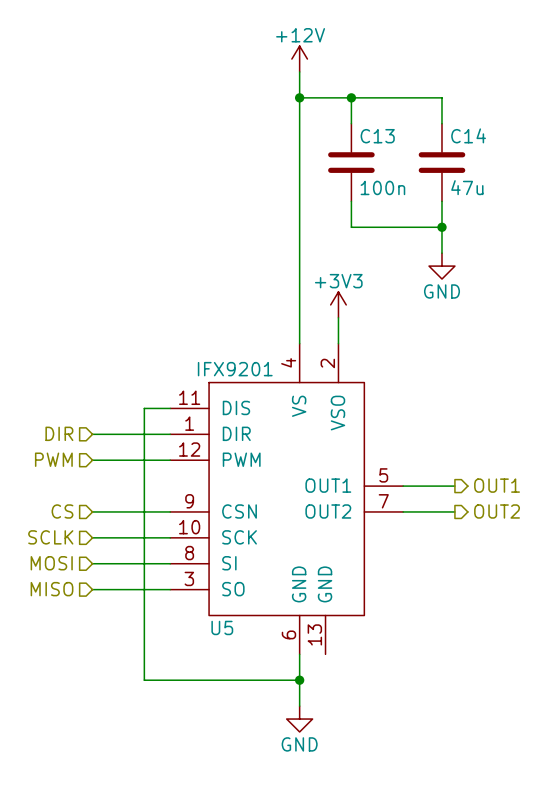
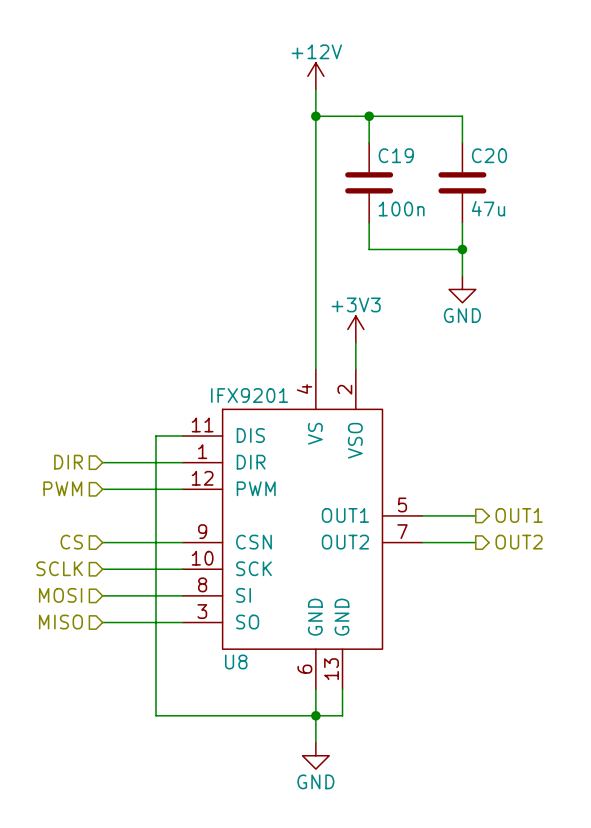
C14 name: C14 (468, 135) -> C20 (489, 155)
C13 name: C13 (377, 136) -> C19 (396, 155)
U5 name: U5 (222, 627) -> U8 (236, 661)
wire: none -> (342, 689) (342, 715) (315, 715)

